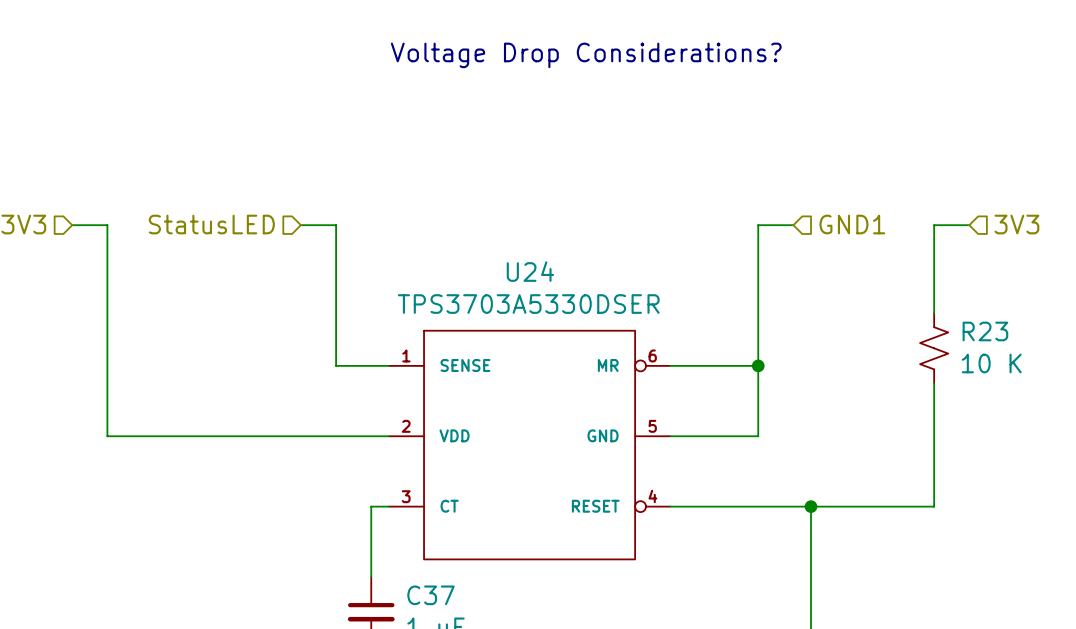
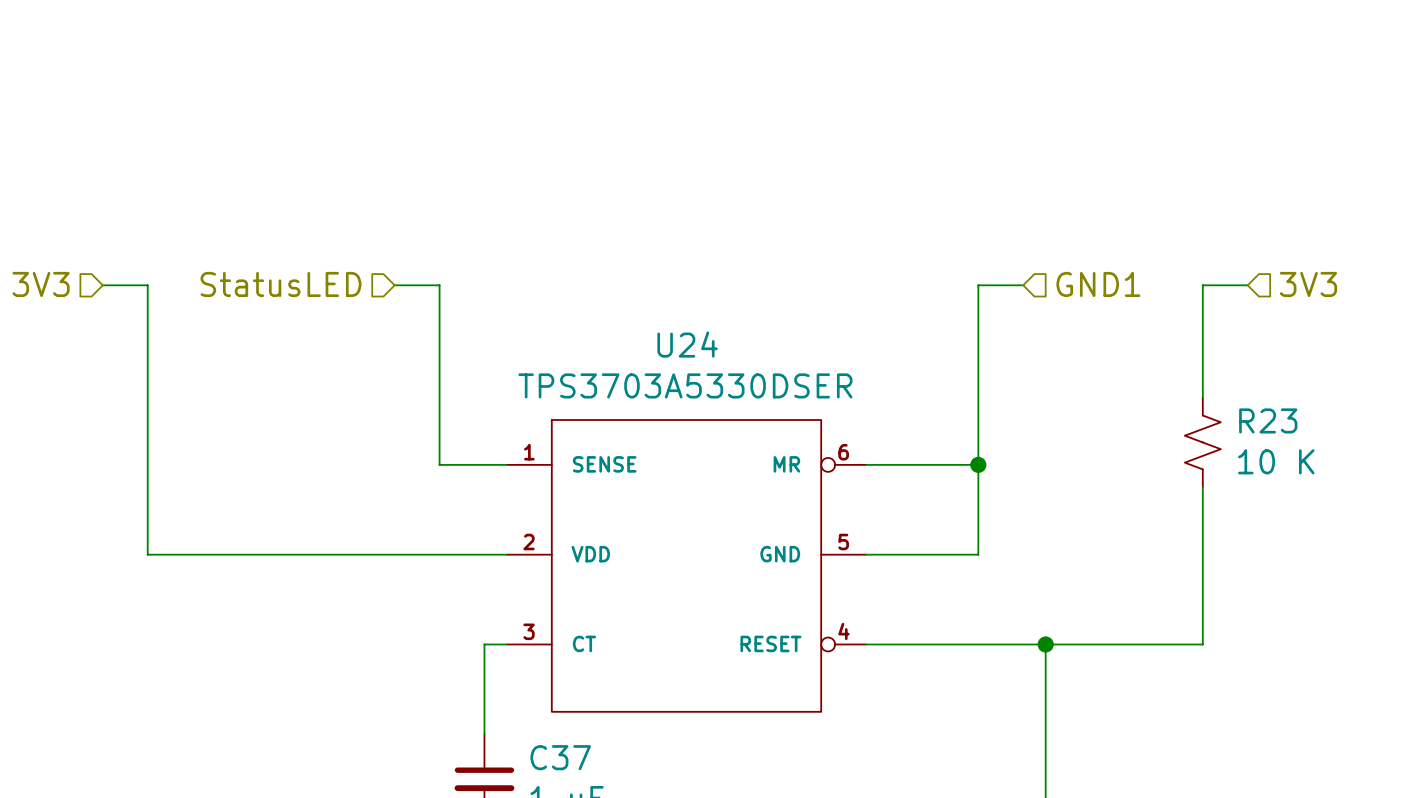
text: Voltage Drop Considerations? (586, 55) -> none

